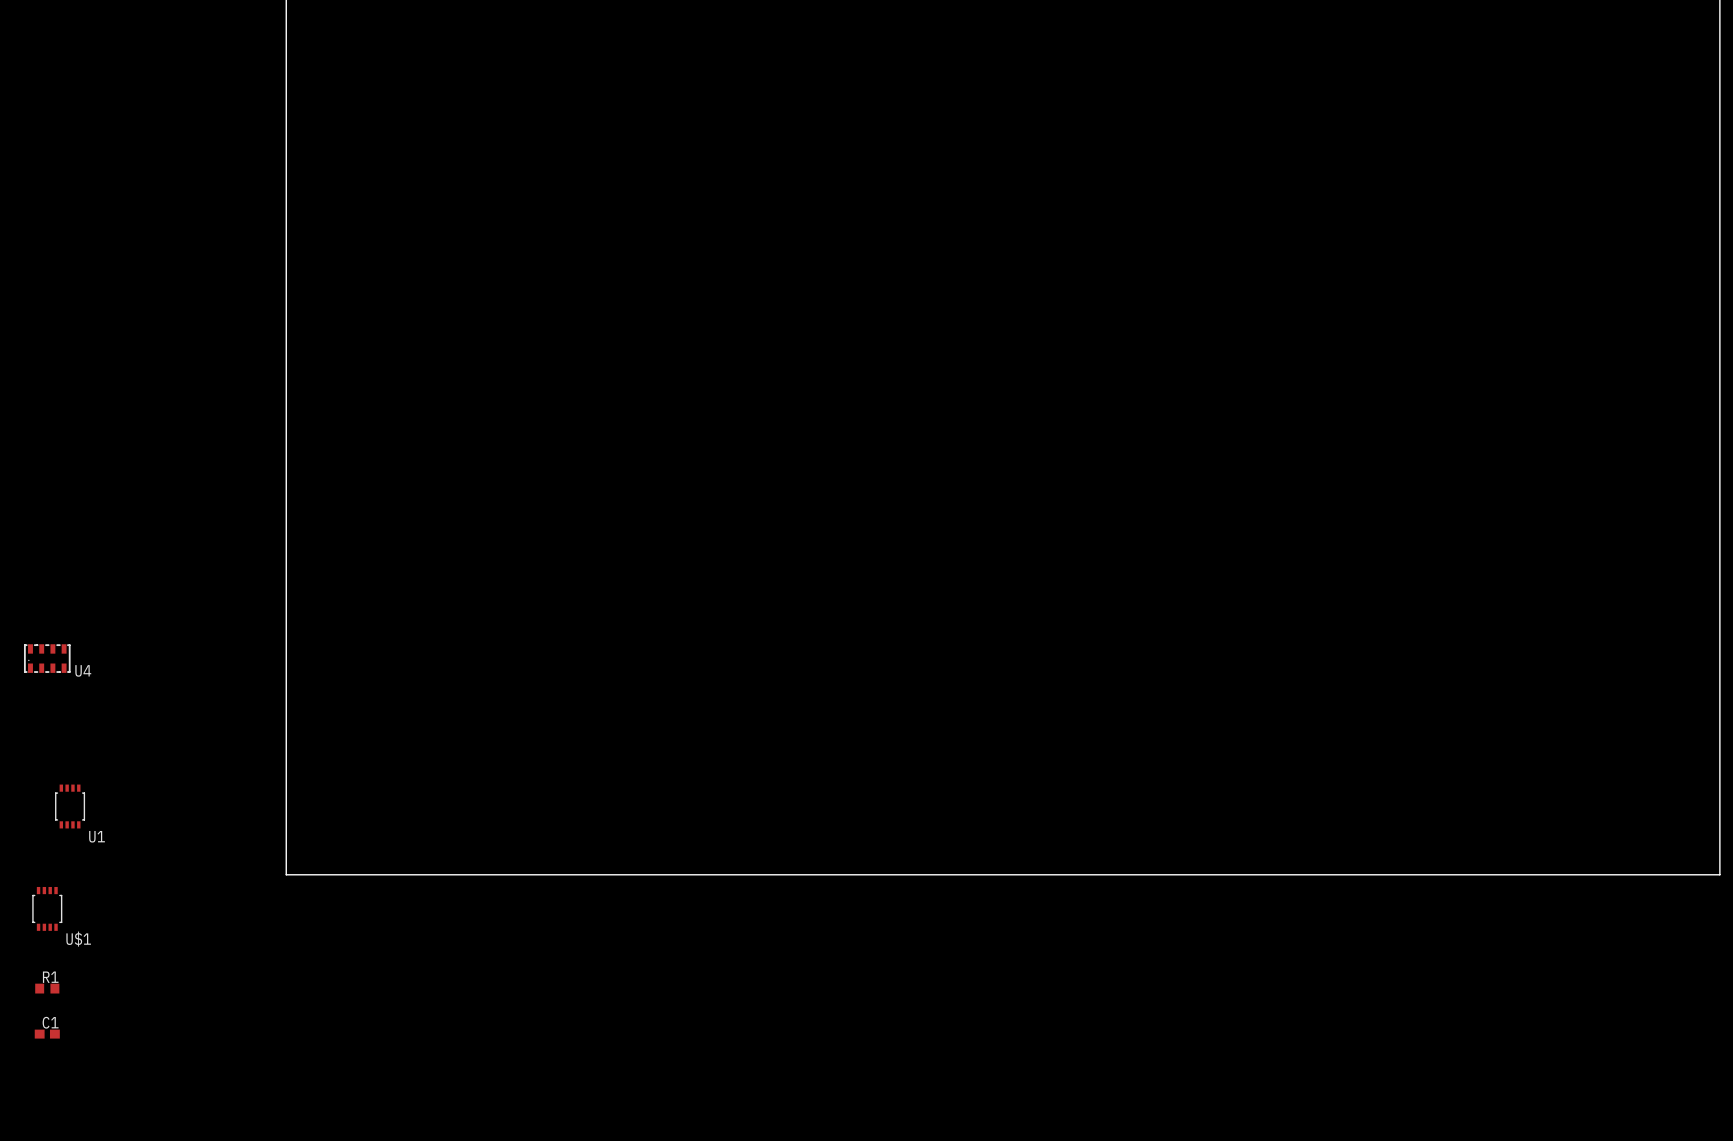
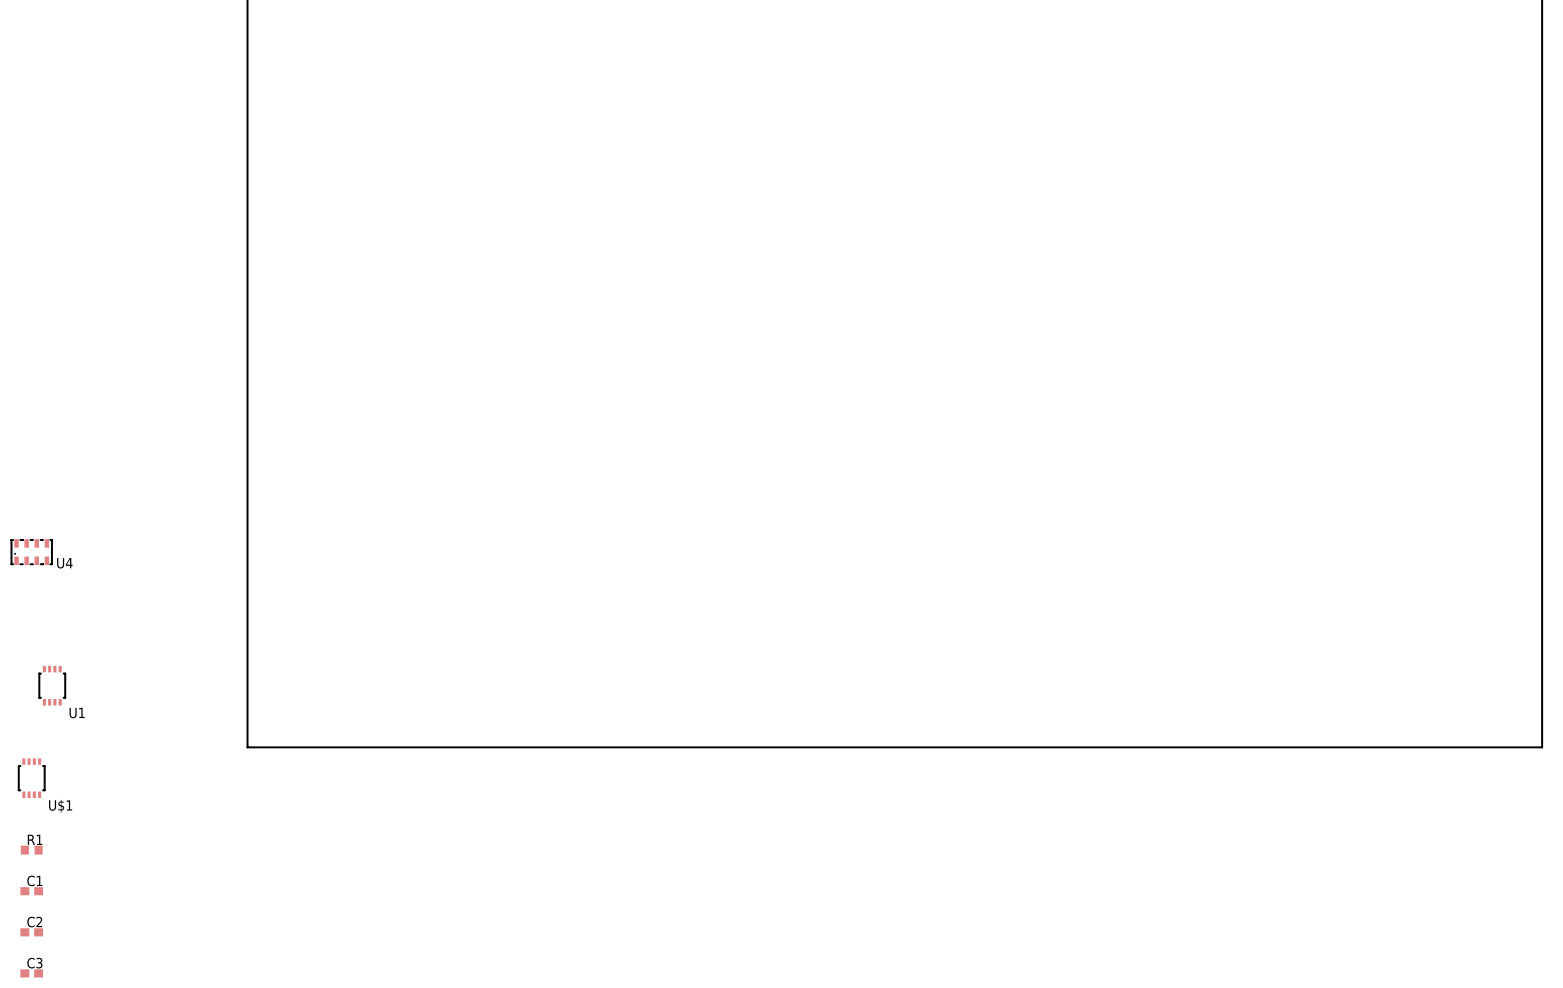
C2: none -> (31, 932)
C3: none -> (31, 973)

